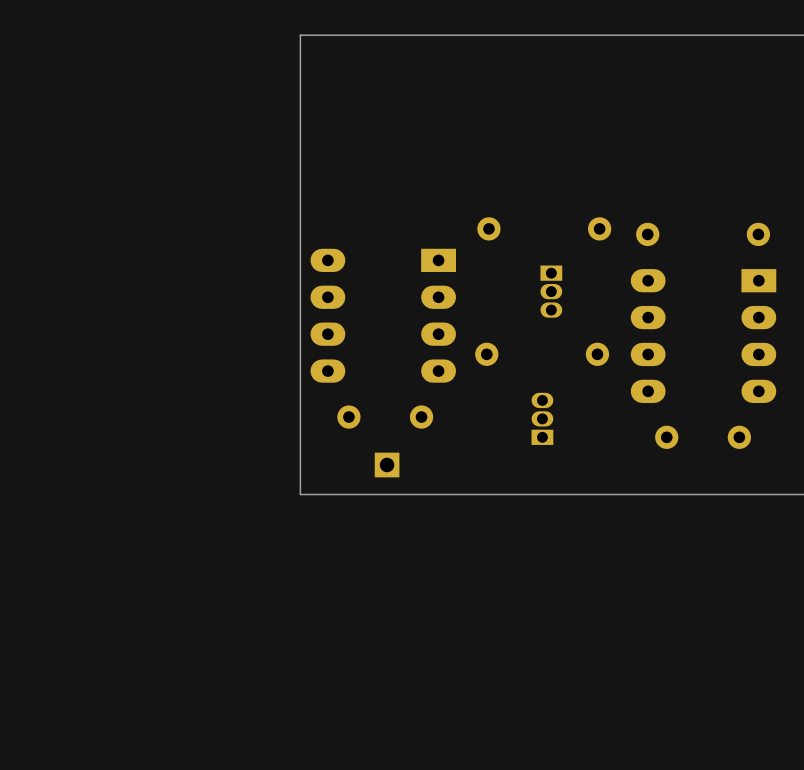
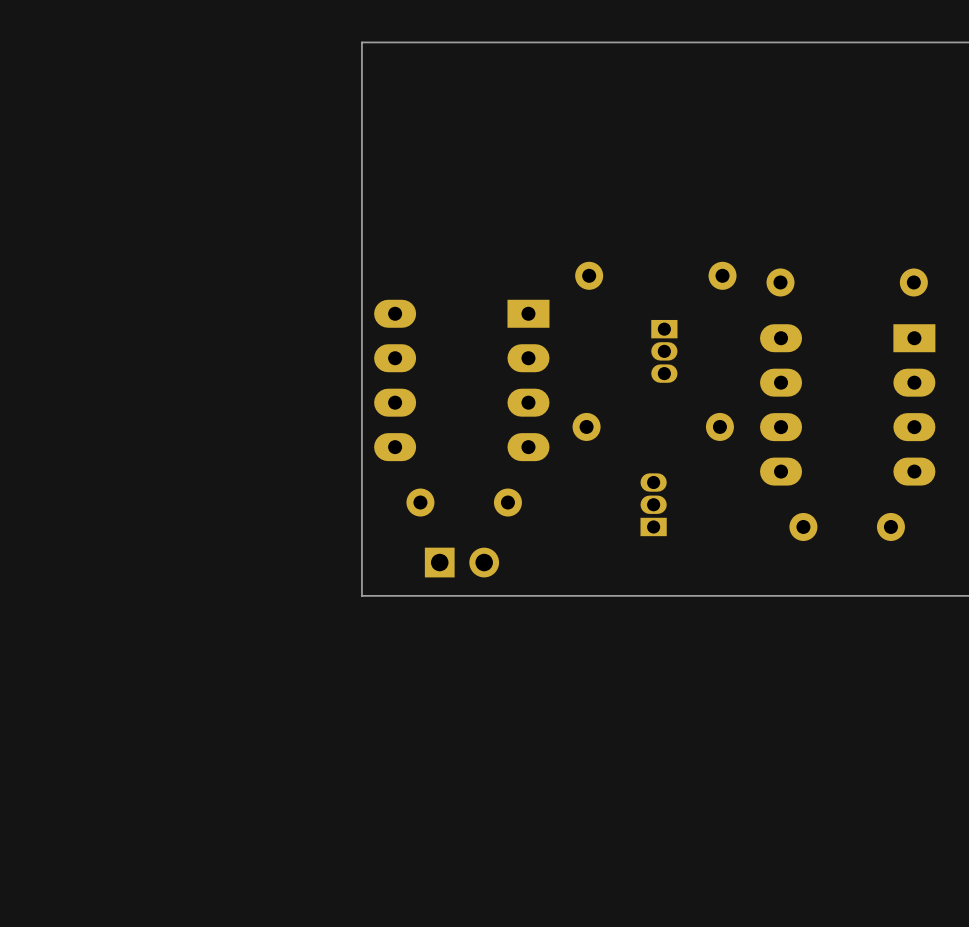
part footprint: [374, 452, 400, 478] -> [424, 547, 500, 578]

